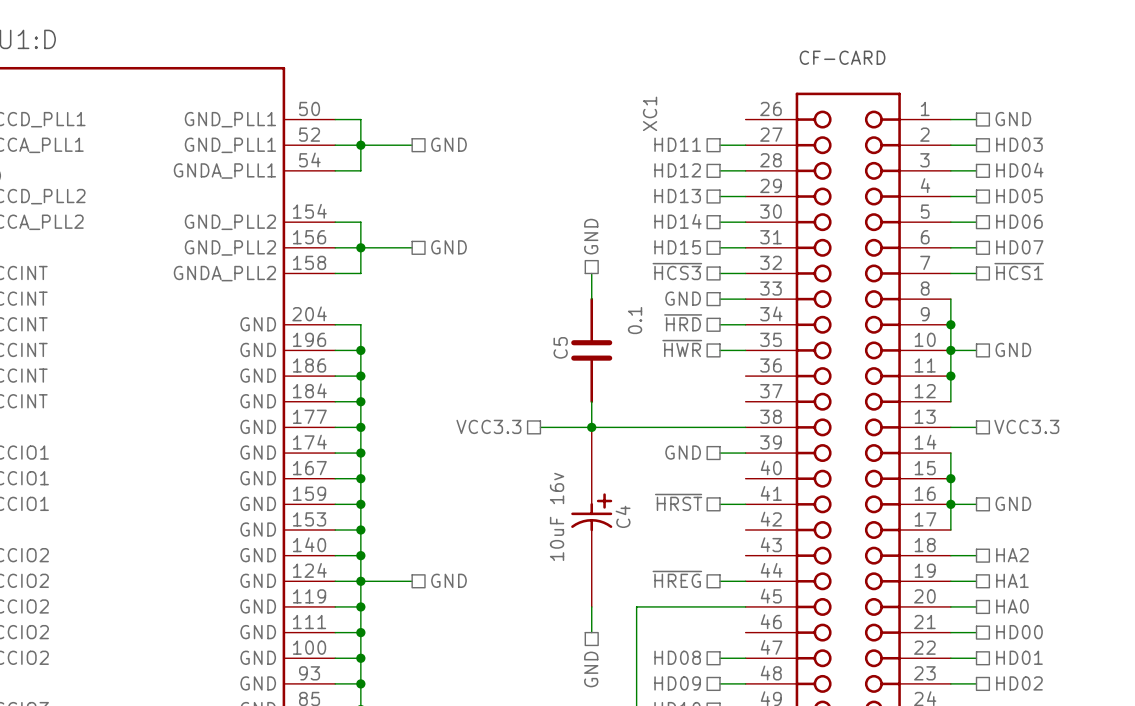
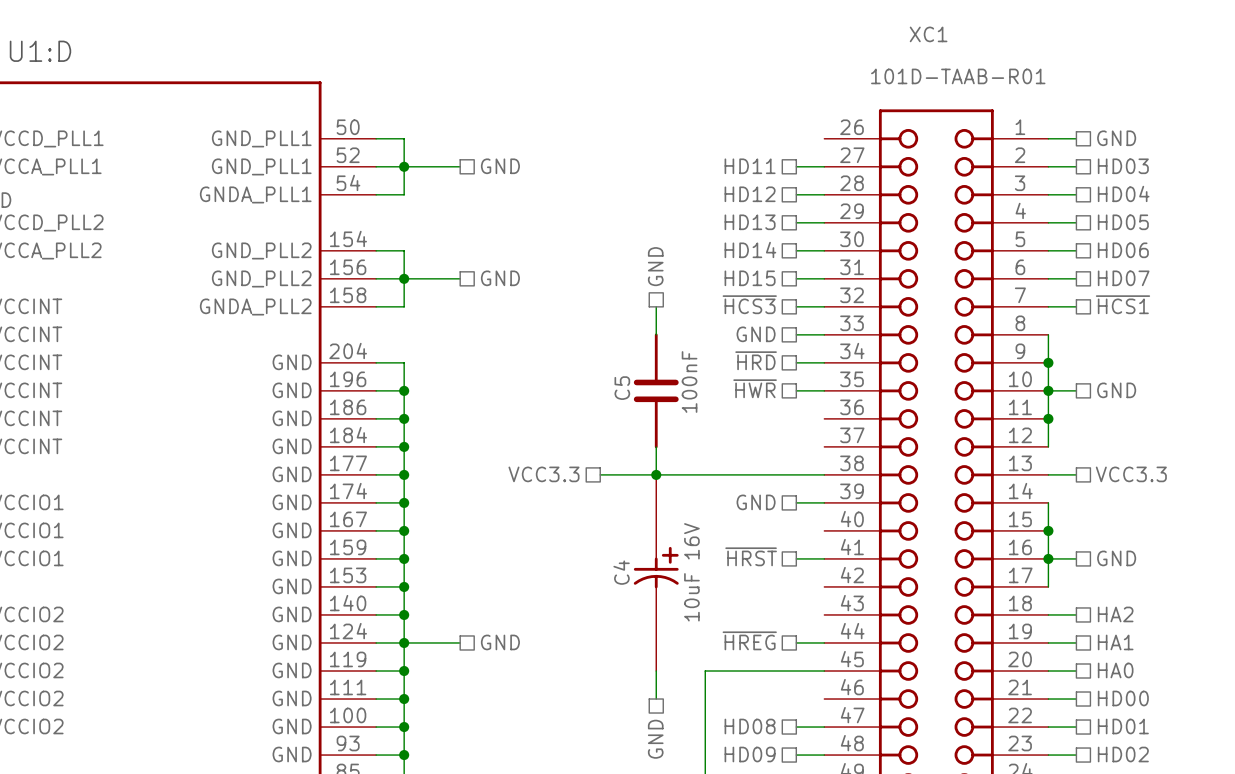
text: CF-CARD (842, 57) -> none
XC1 value: none -> 101D-TAAB-R01 (958, 76)
XC1 name rotation: 0° (650, 113) -> 90° clockwise (928, 34)
XC1 name position: XC1 (650, 113) -> XC1 (928, 34)
C5 text: 0.1 (635, 320) -> none
C5 value: none -> 100nF (689, 381)
C4 text: 10uF 16v (557, 516) -> none
C4 name position: C4 (623, 516) -> C4 (621, 572)
C4 value: none -> 10uF 16V (691, 572)

